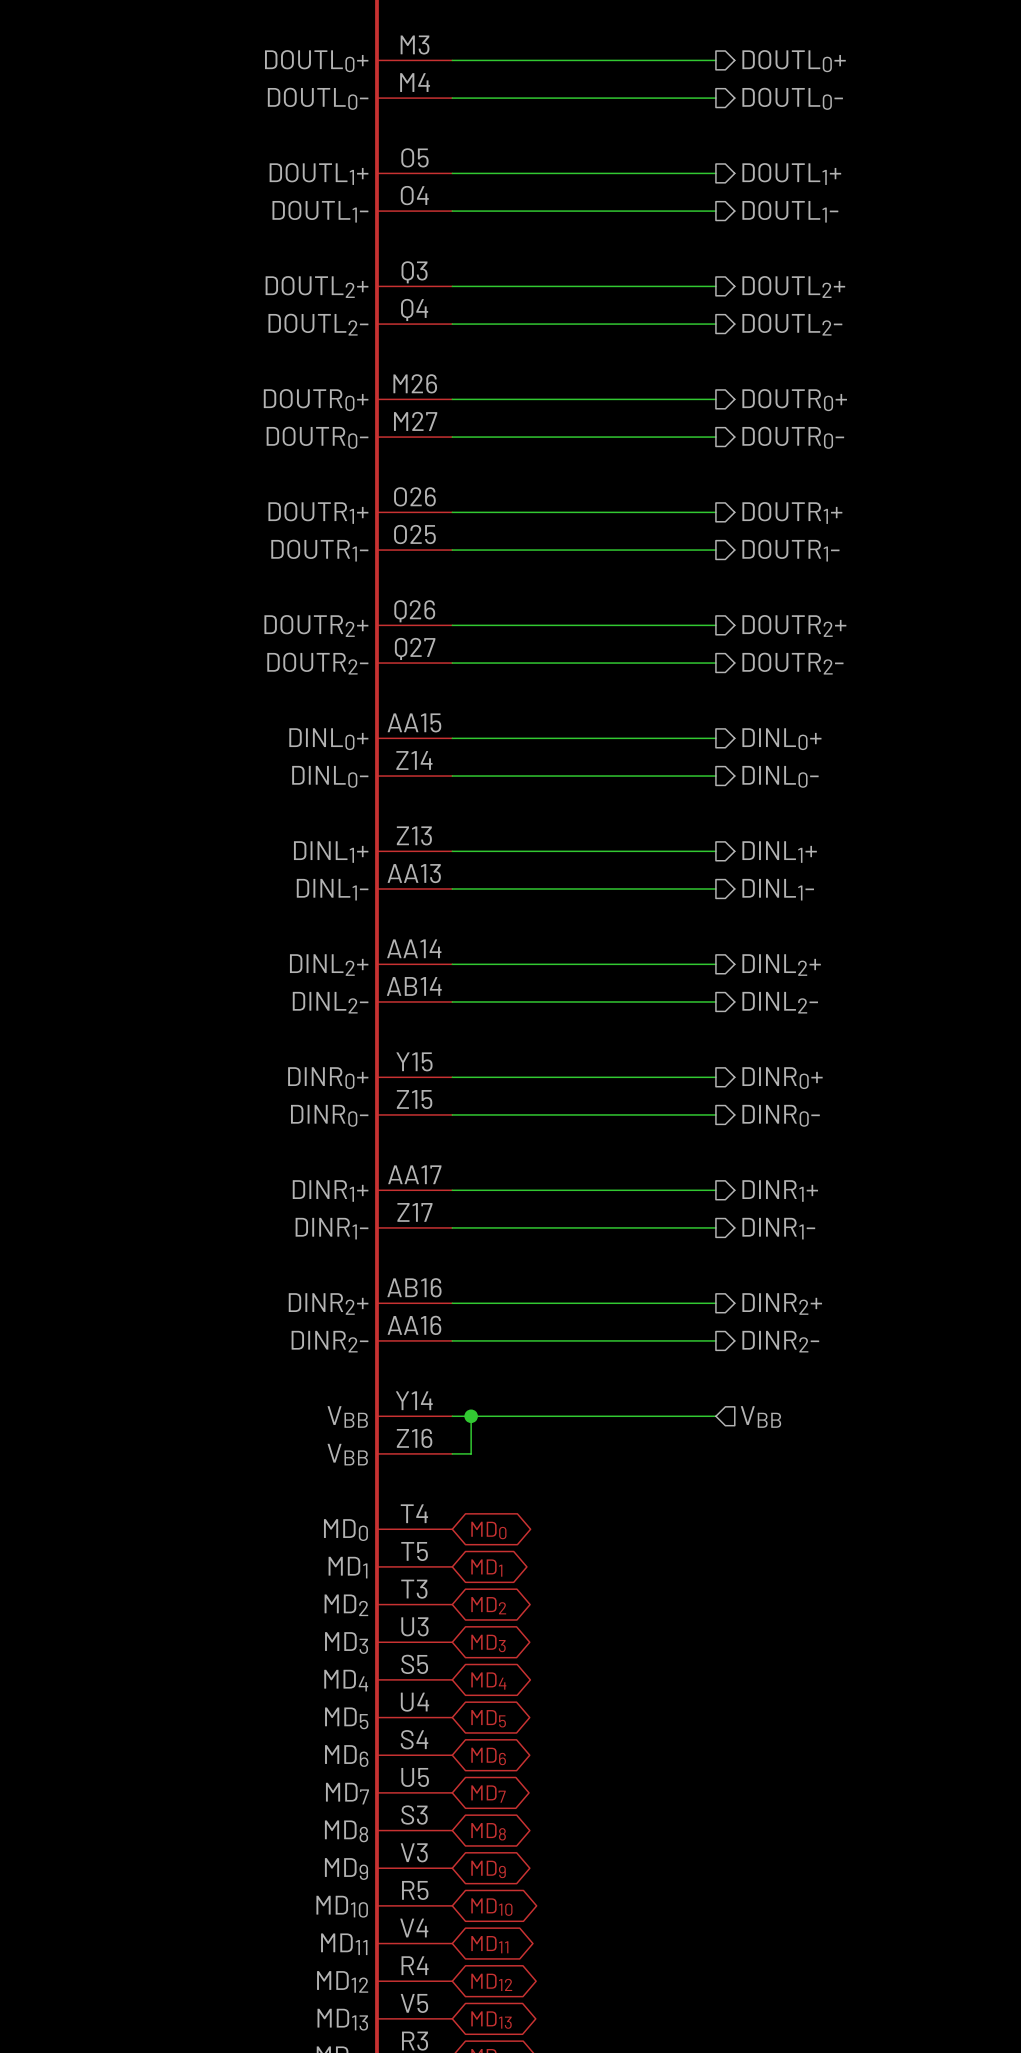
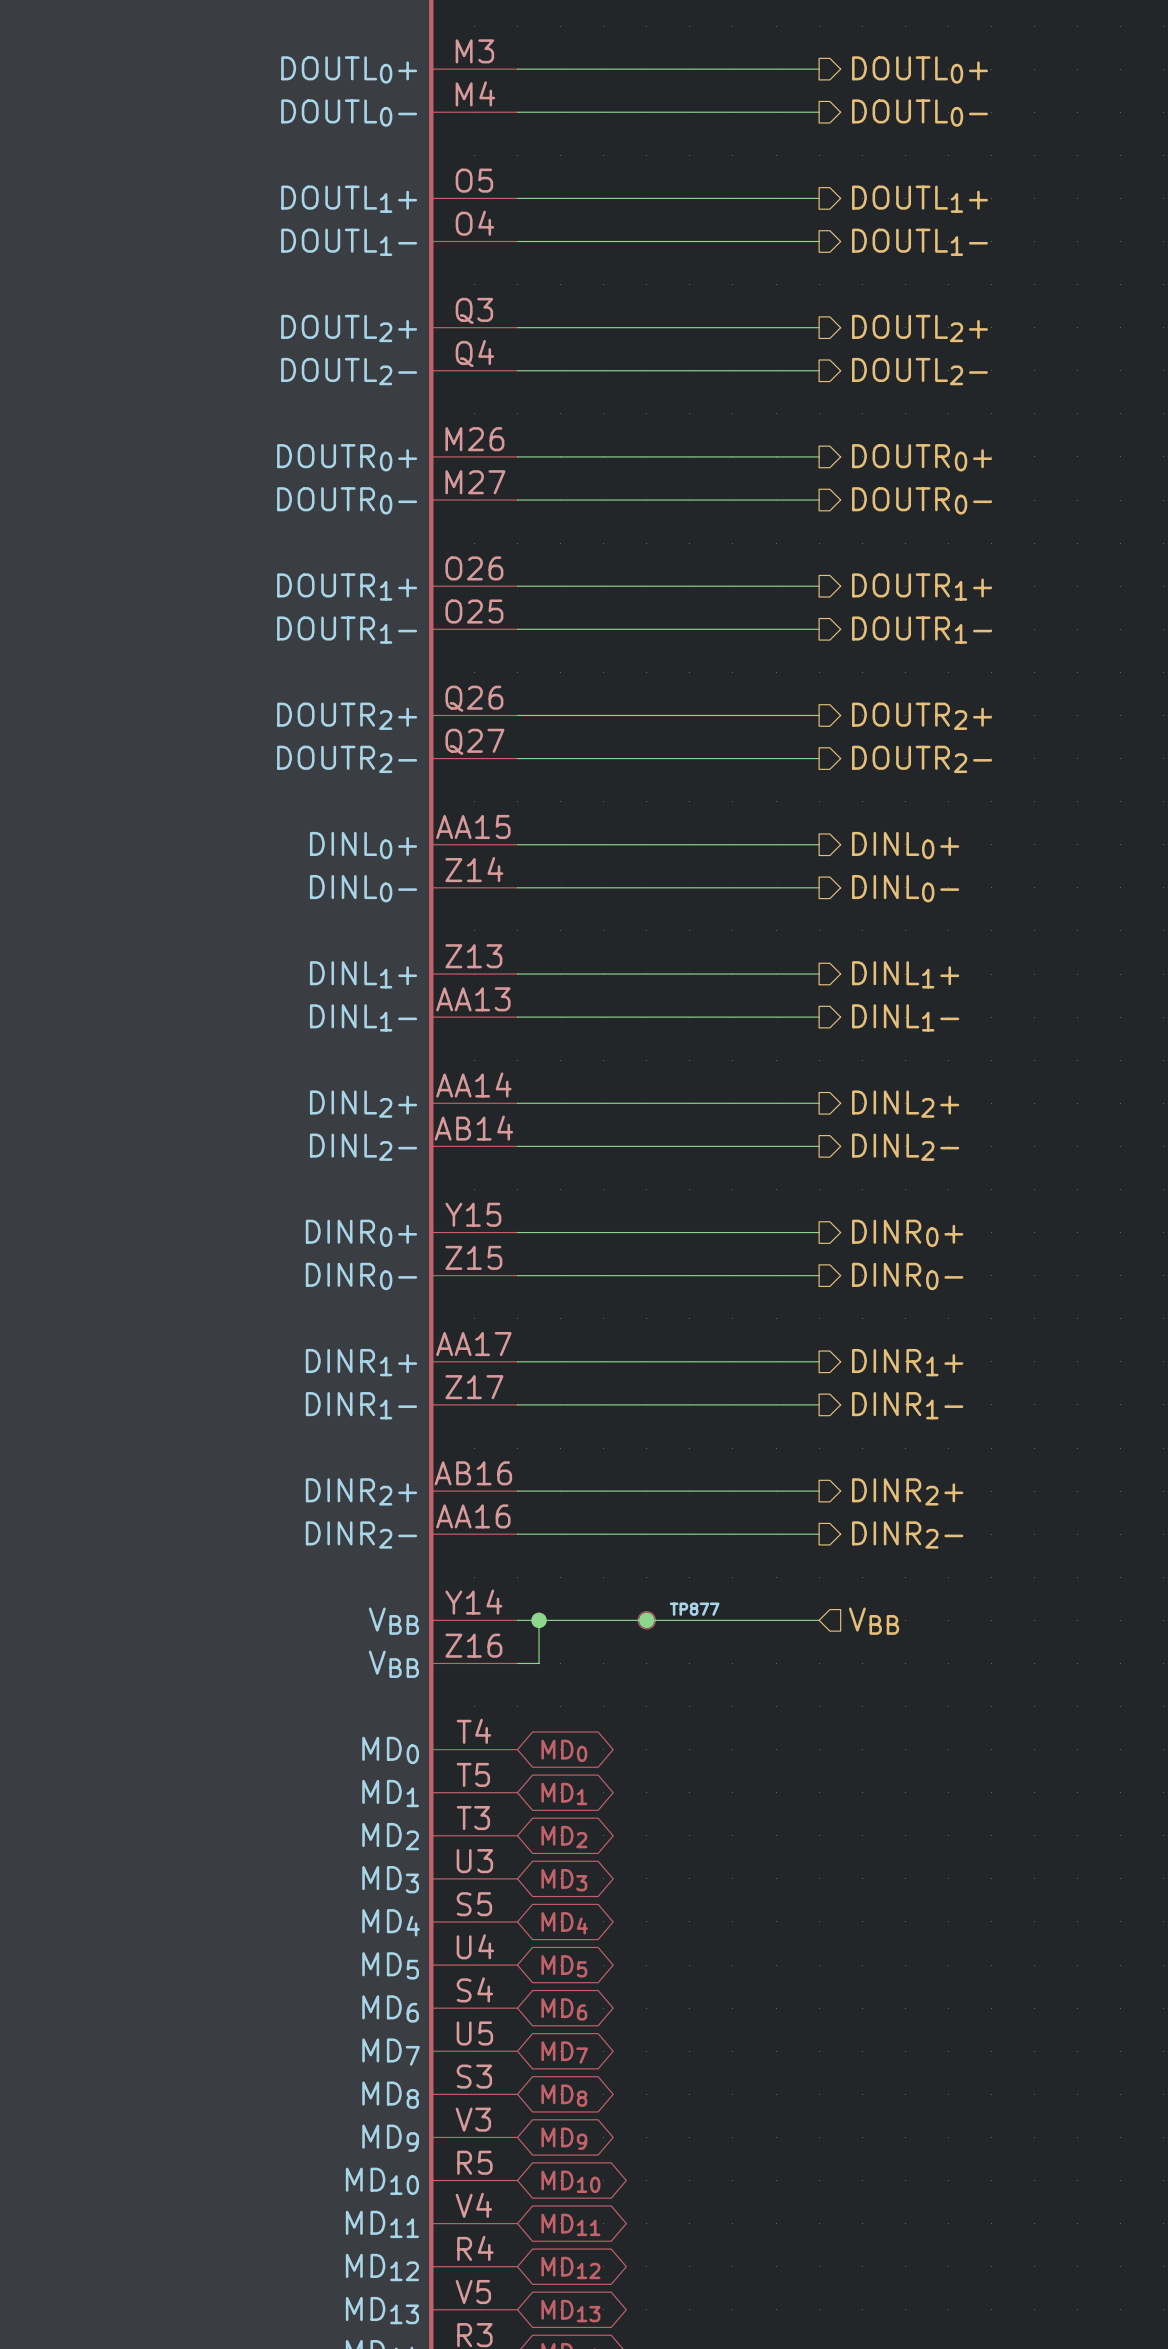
junction: none -> (646, 1620)
TP877: none -> (646, 1620)

